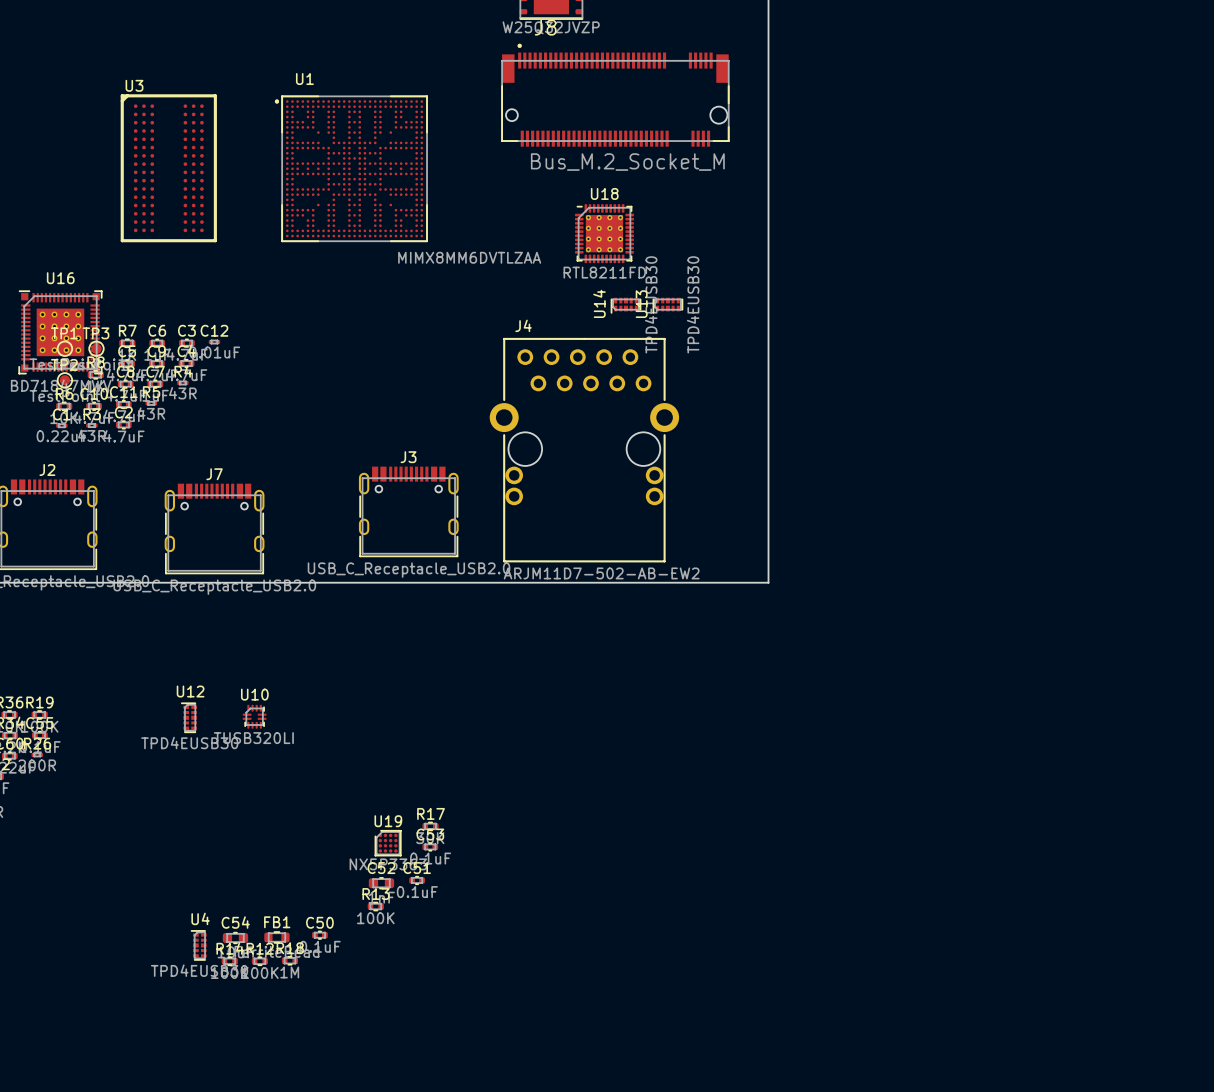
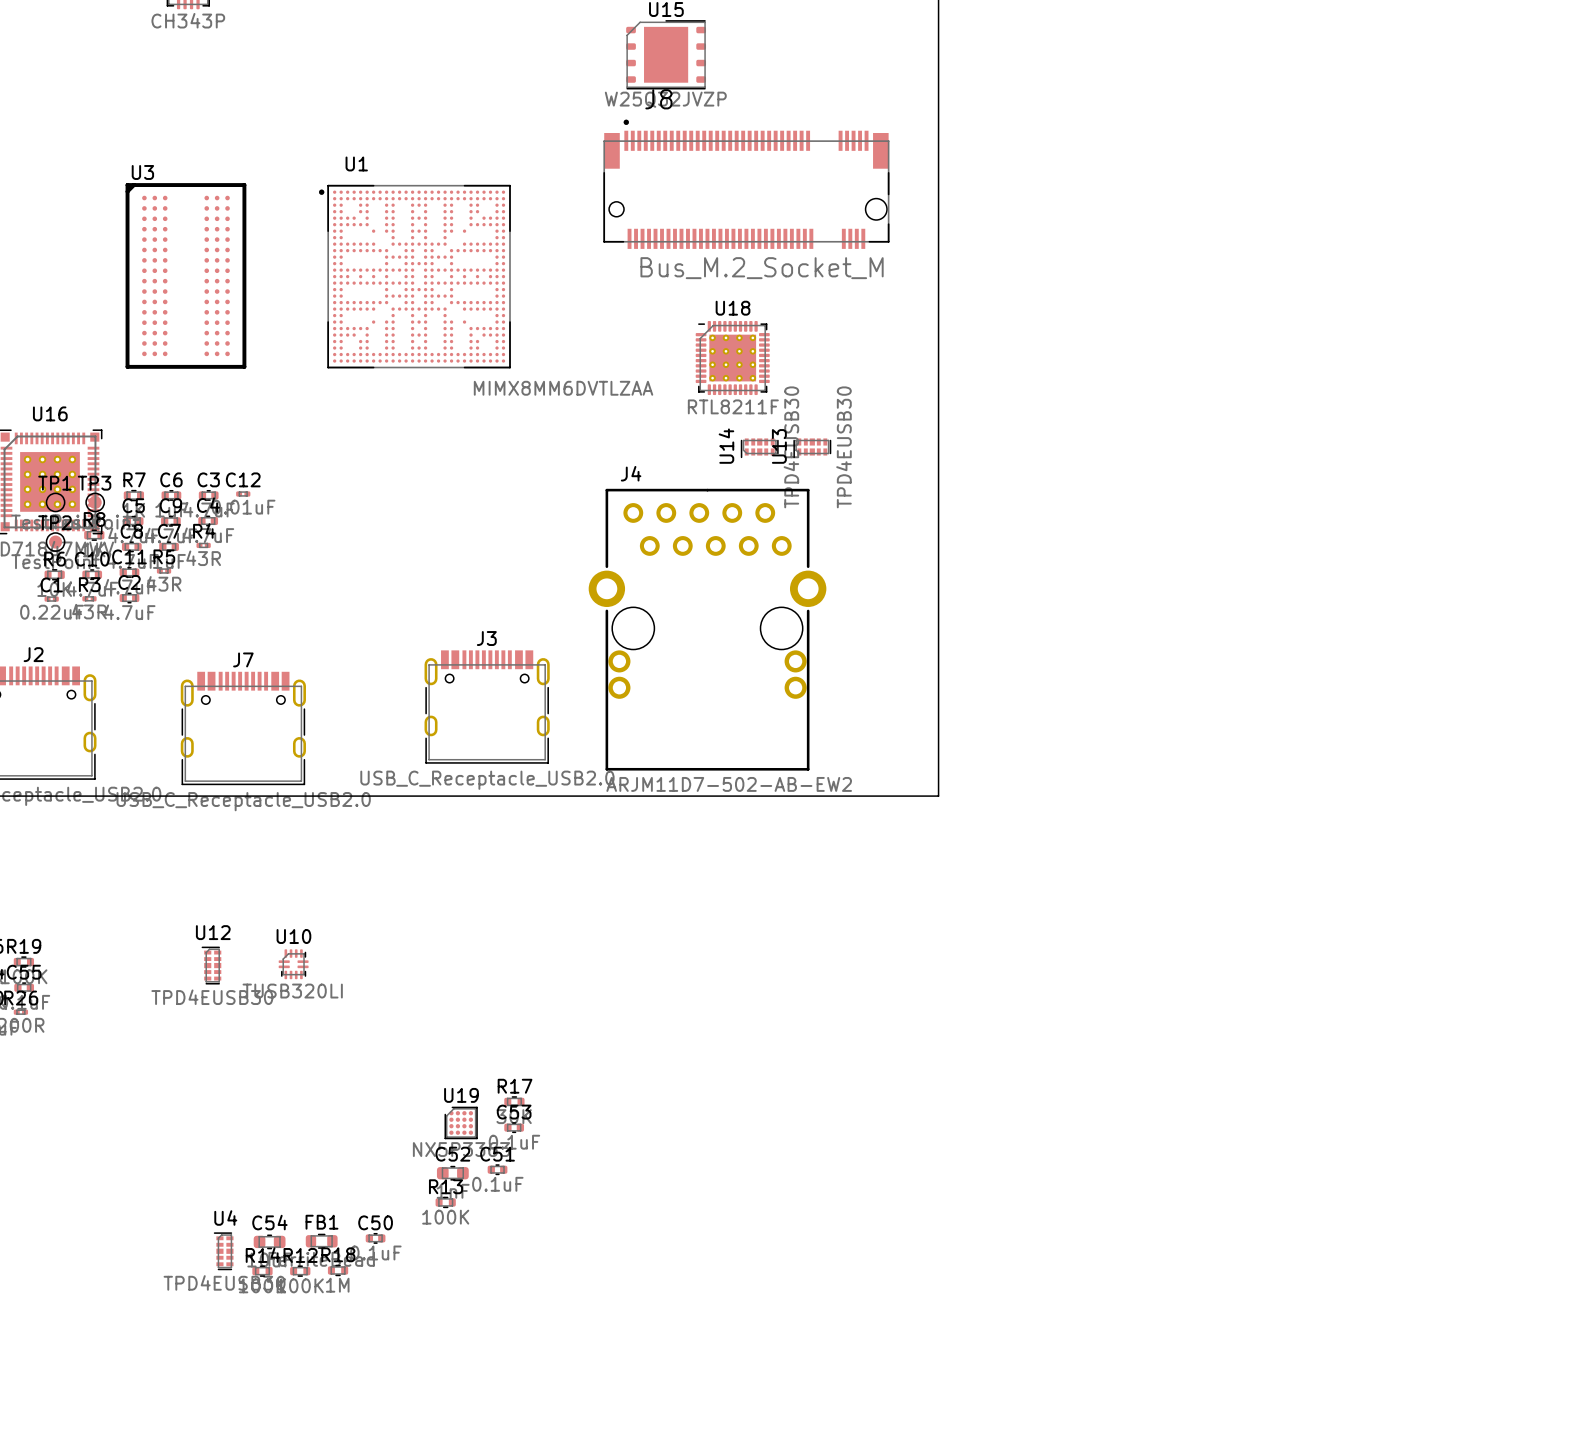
U18 value: RTL8211FD (604, 272) -> RTL8211F (733, 406)

